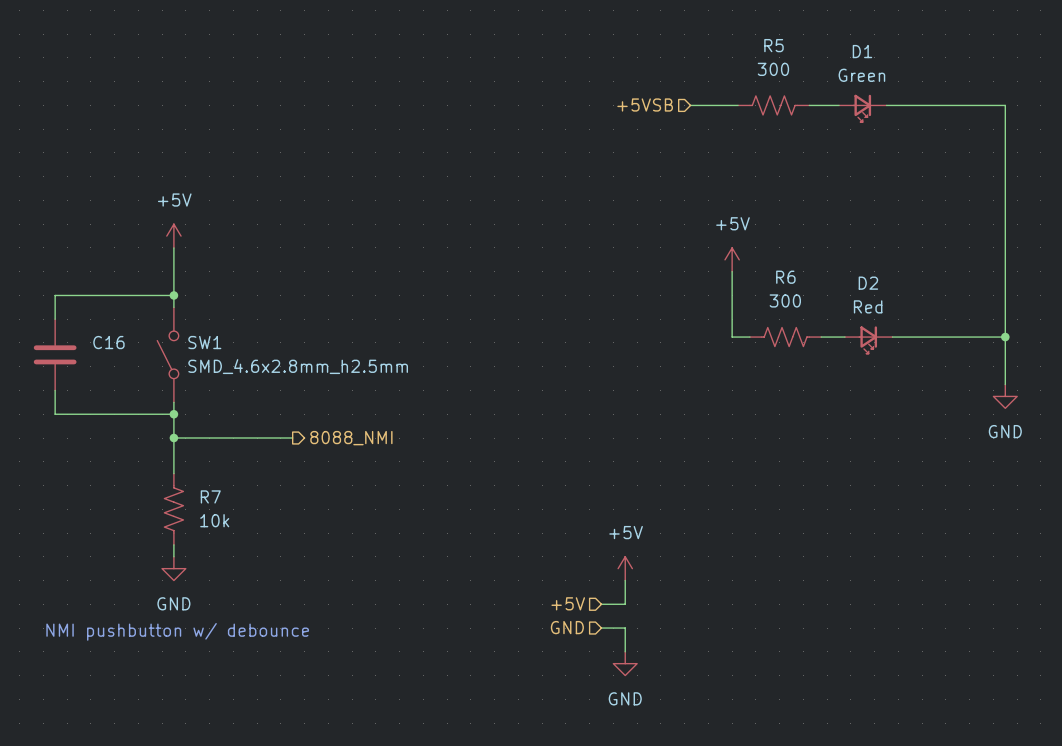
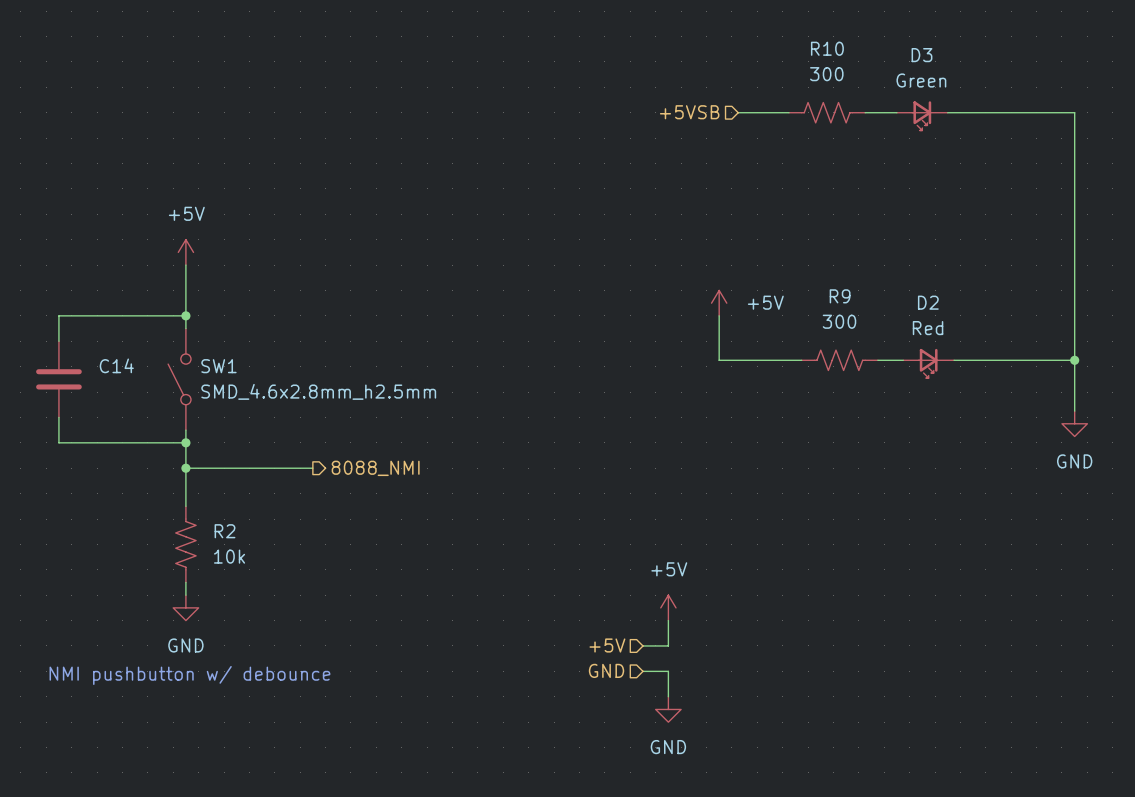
R5 name: R5 (773, 45) -> R10 (827, 48)
D1 name: D1 (862, 51) -> D3 (921, 55)
power symbol text position: +5V (732, 223) -> +5V (765, 302)
power symbol position: +5V (732, 259) -> +5V (719, 303)
wire: (732, 271) (732, 337) -> (719, 315) (719, 360) (782, 360)
R6 name: R6 (785, 277) -> R9 (840, 296)
C16 name: C16 (108, 342) -> C14 (116, 365)
R7 name: R7 (210, 496) -> R2 (225, 531)

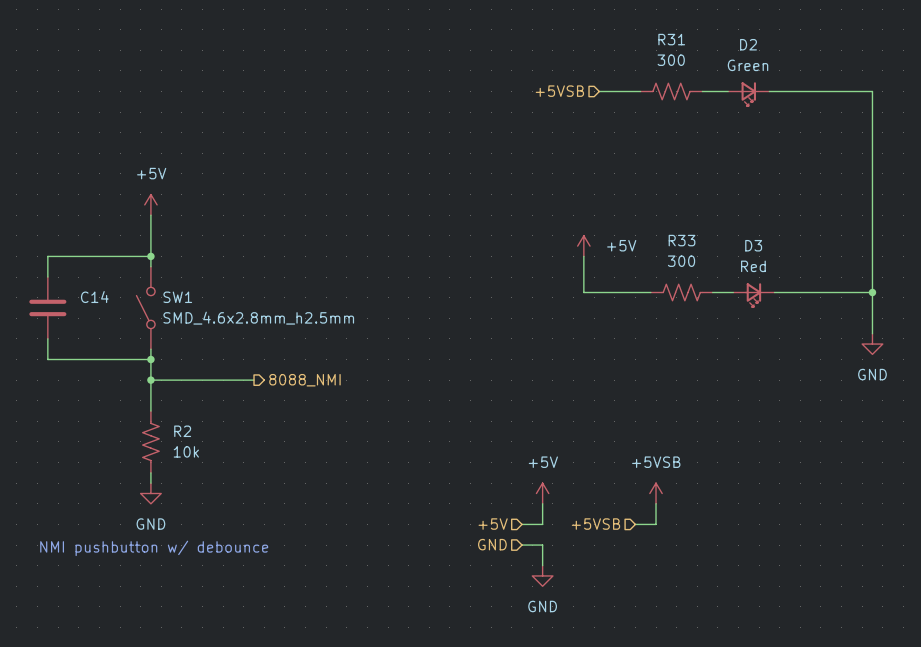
R10 name: R10 (827, 48) -> R31 (671, 39)
D3 name: D3 (921, 55) -> D2 (748, 44)
R9 name: R9 (840, 296) -> R33 (682, 240)
D2 name: D2 (928, 302) -> D3 (753, 245)
power symbol: none -> +5VSB (656, 493)
wire: none -> (656, 503) (656, 524) (635, 524)
hierarchical label: none -> +5VSB (595, 524)

